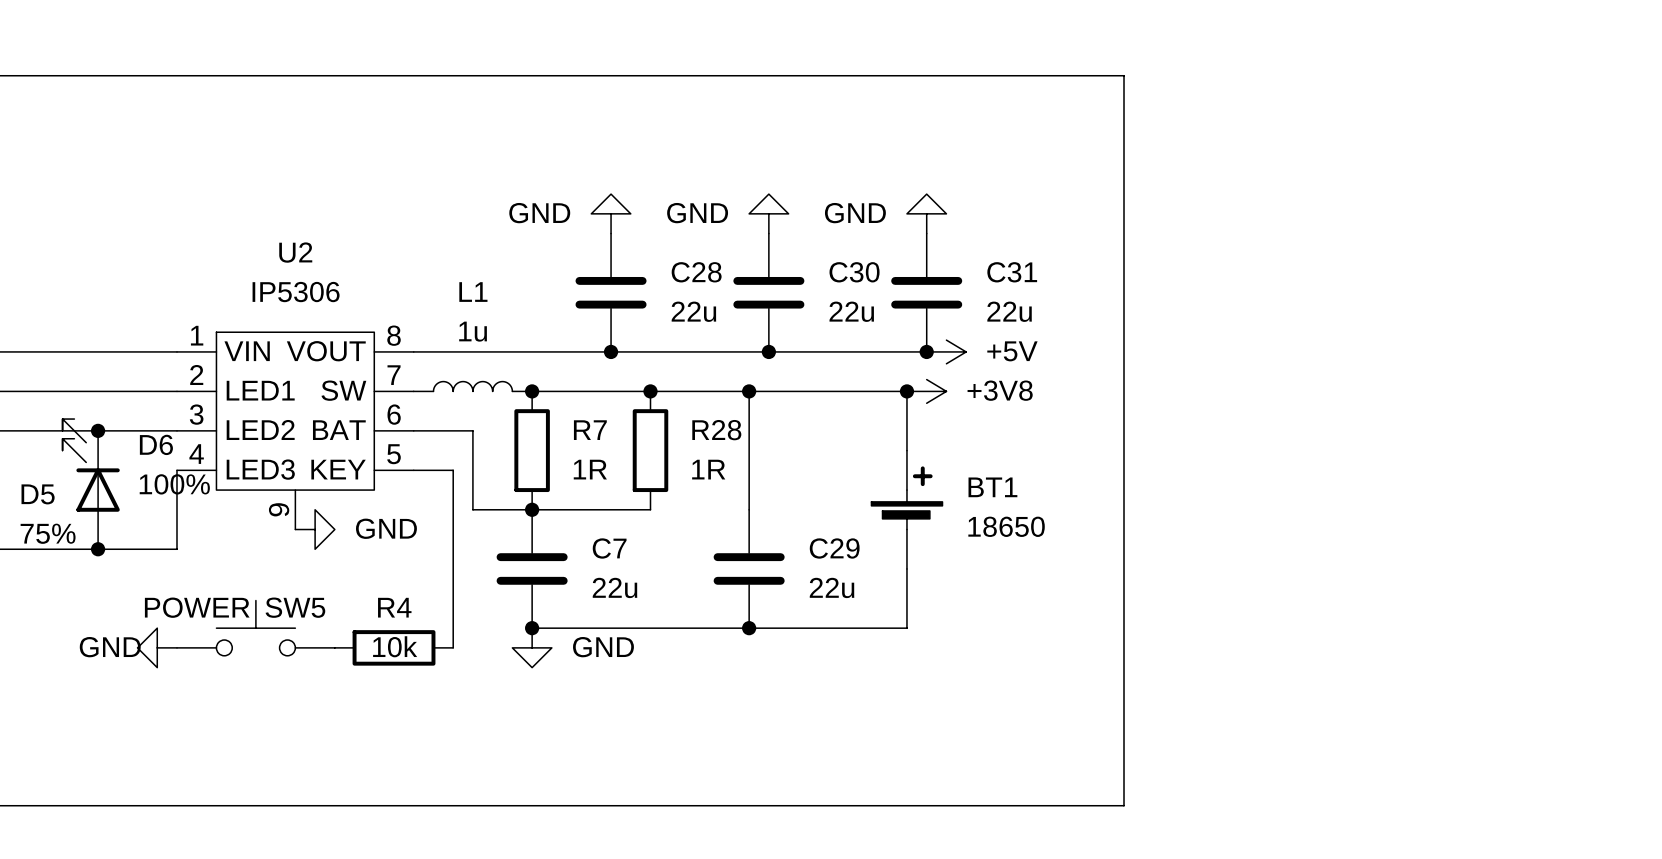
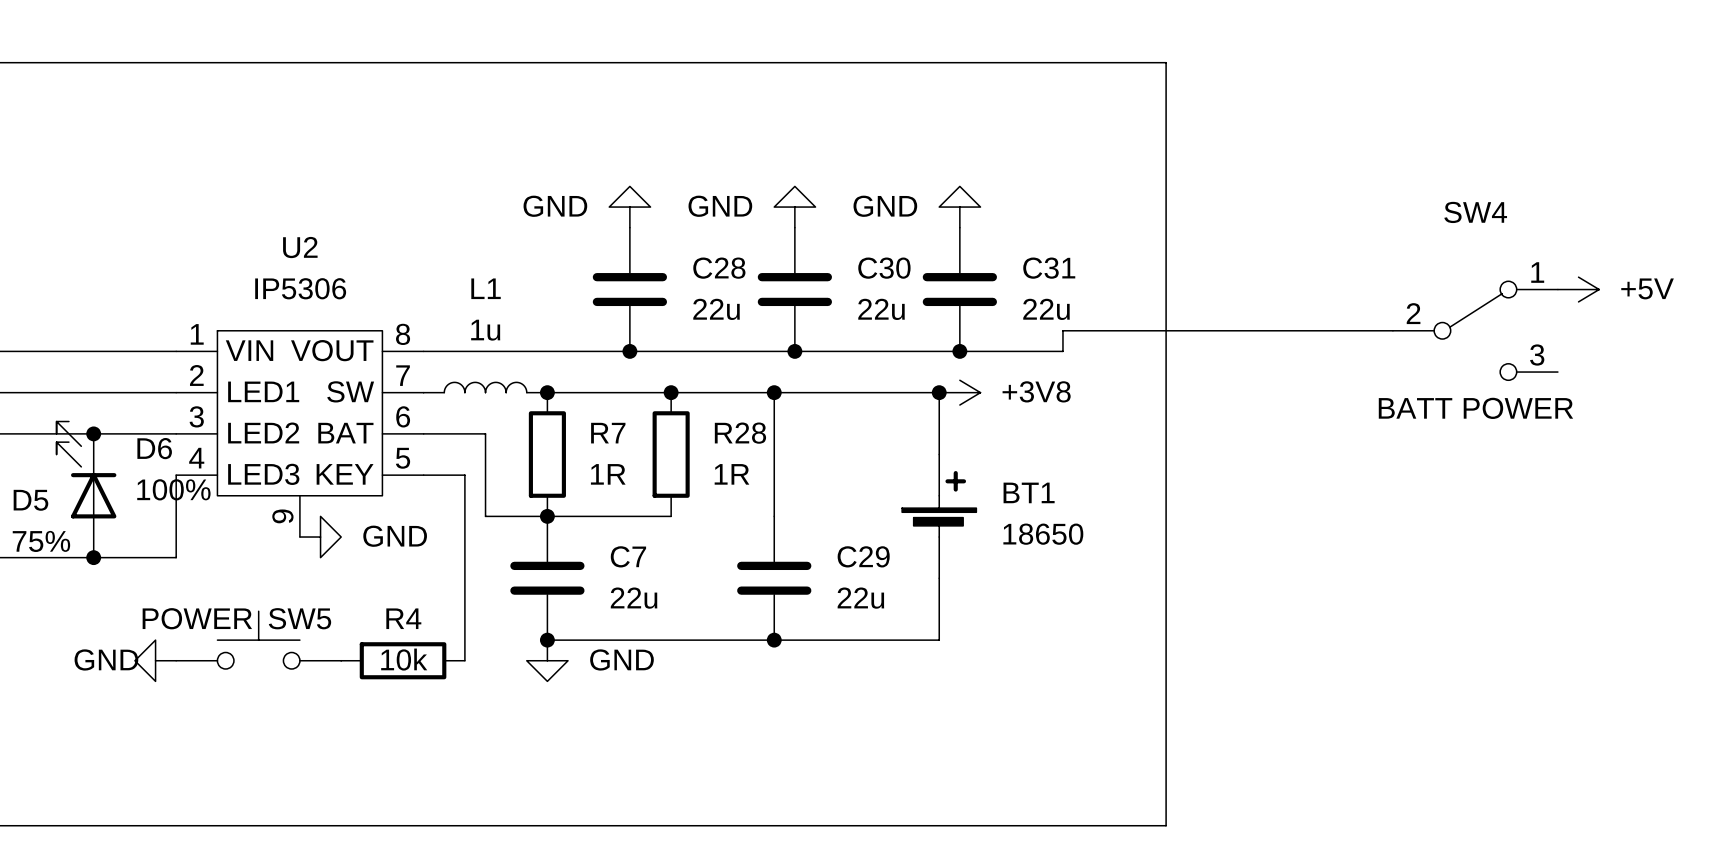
power symbol: none -> +5V (1578, 289)
wire: none -> (1392, 330) (1062, 330) (1062, 351) (959, 351)
SW4: none -> BATT POWER (1475, 330)
power symbol: +5V (946, 351) -> none

